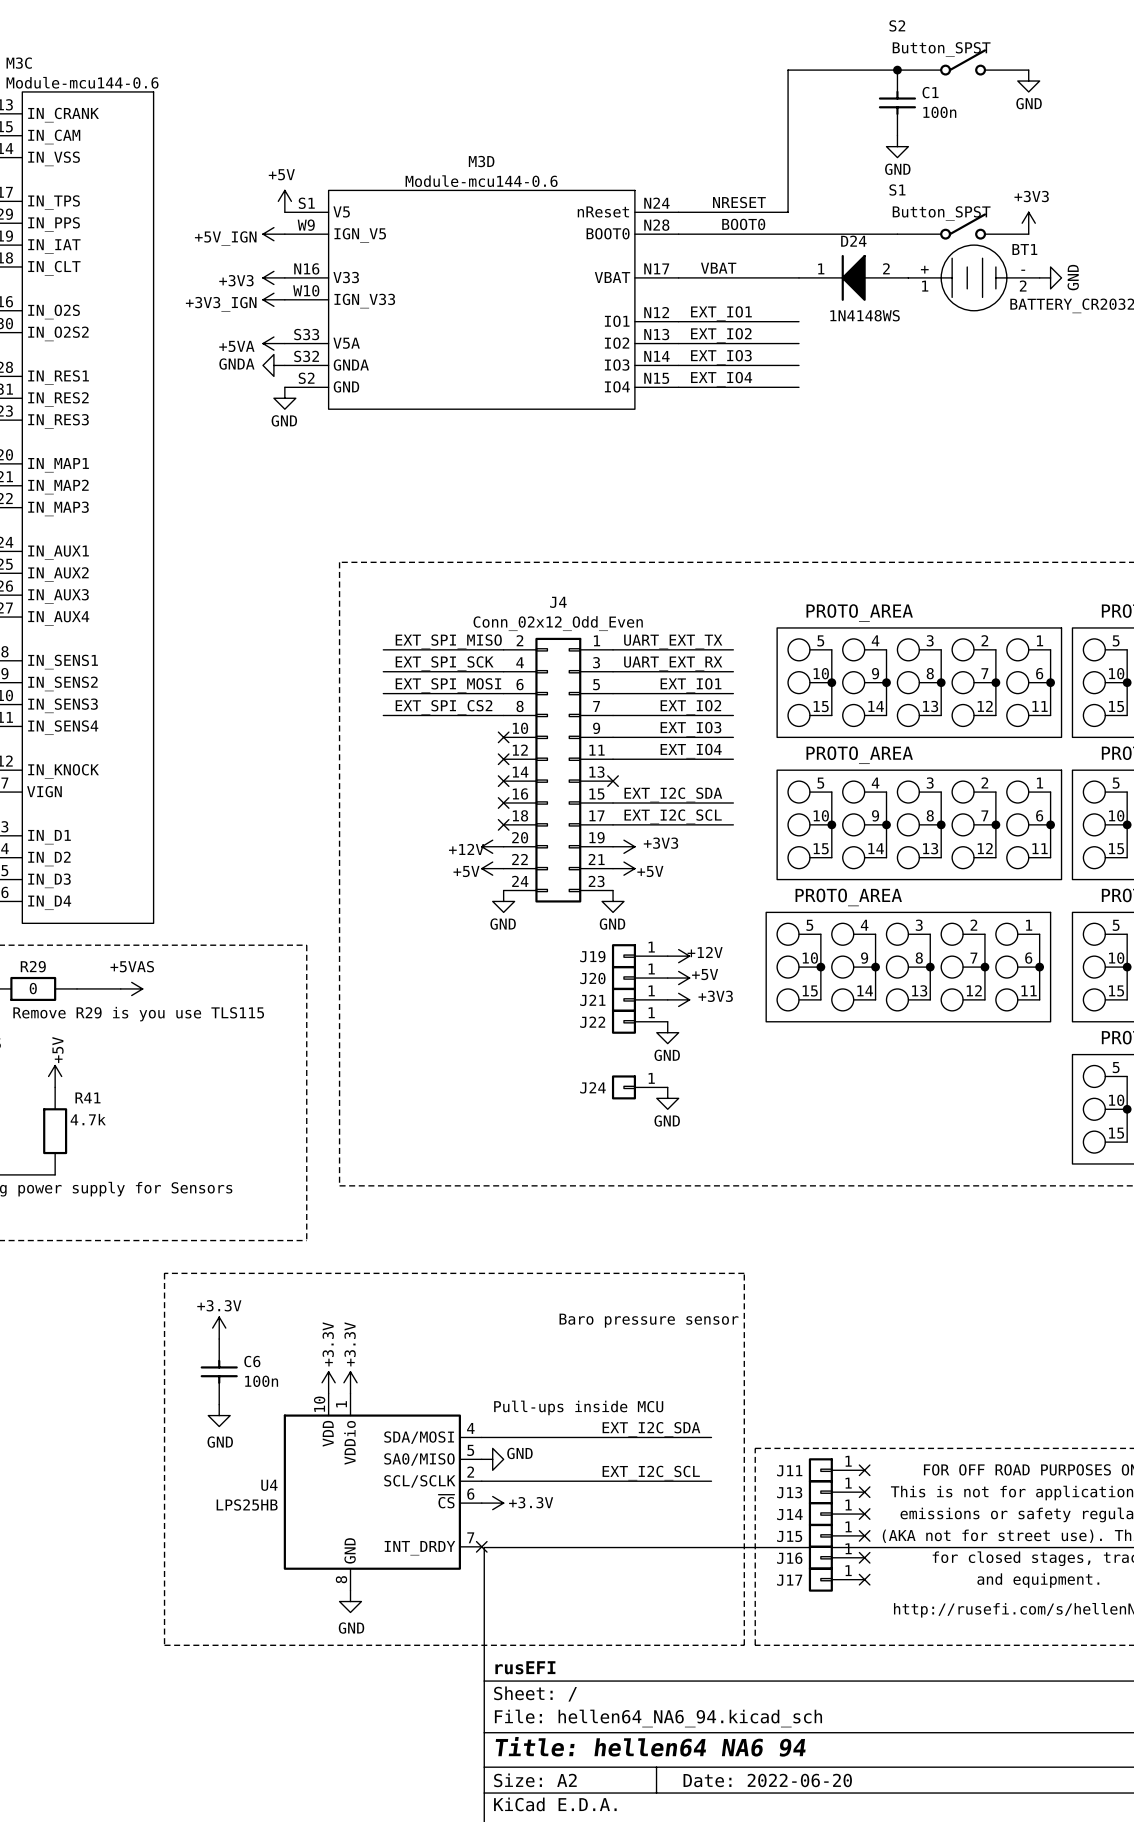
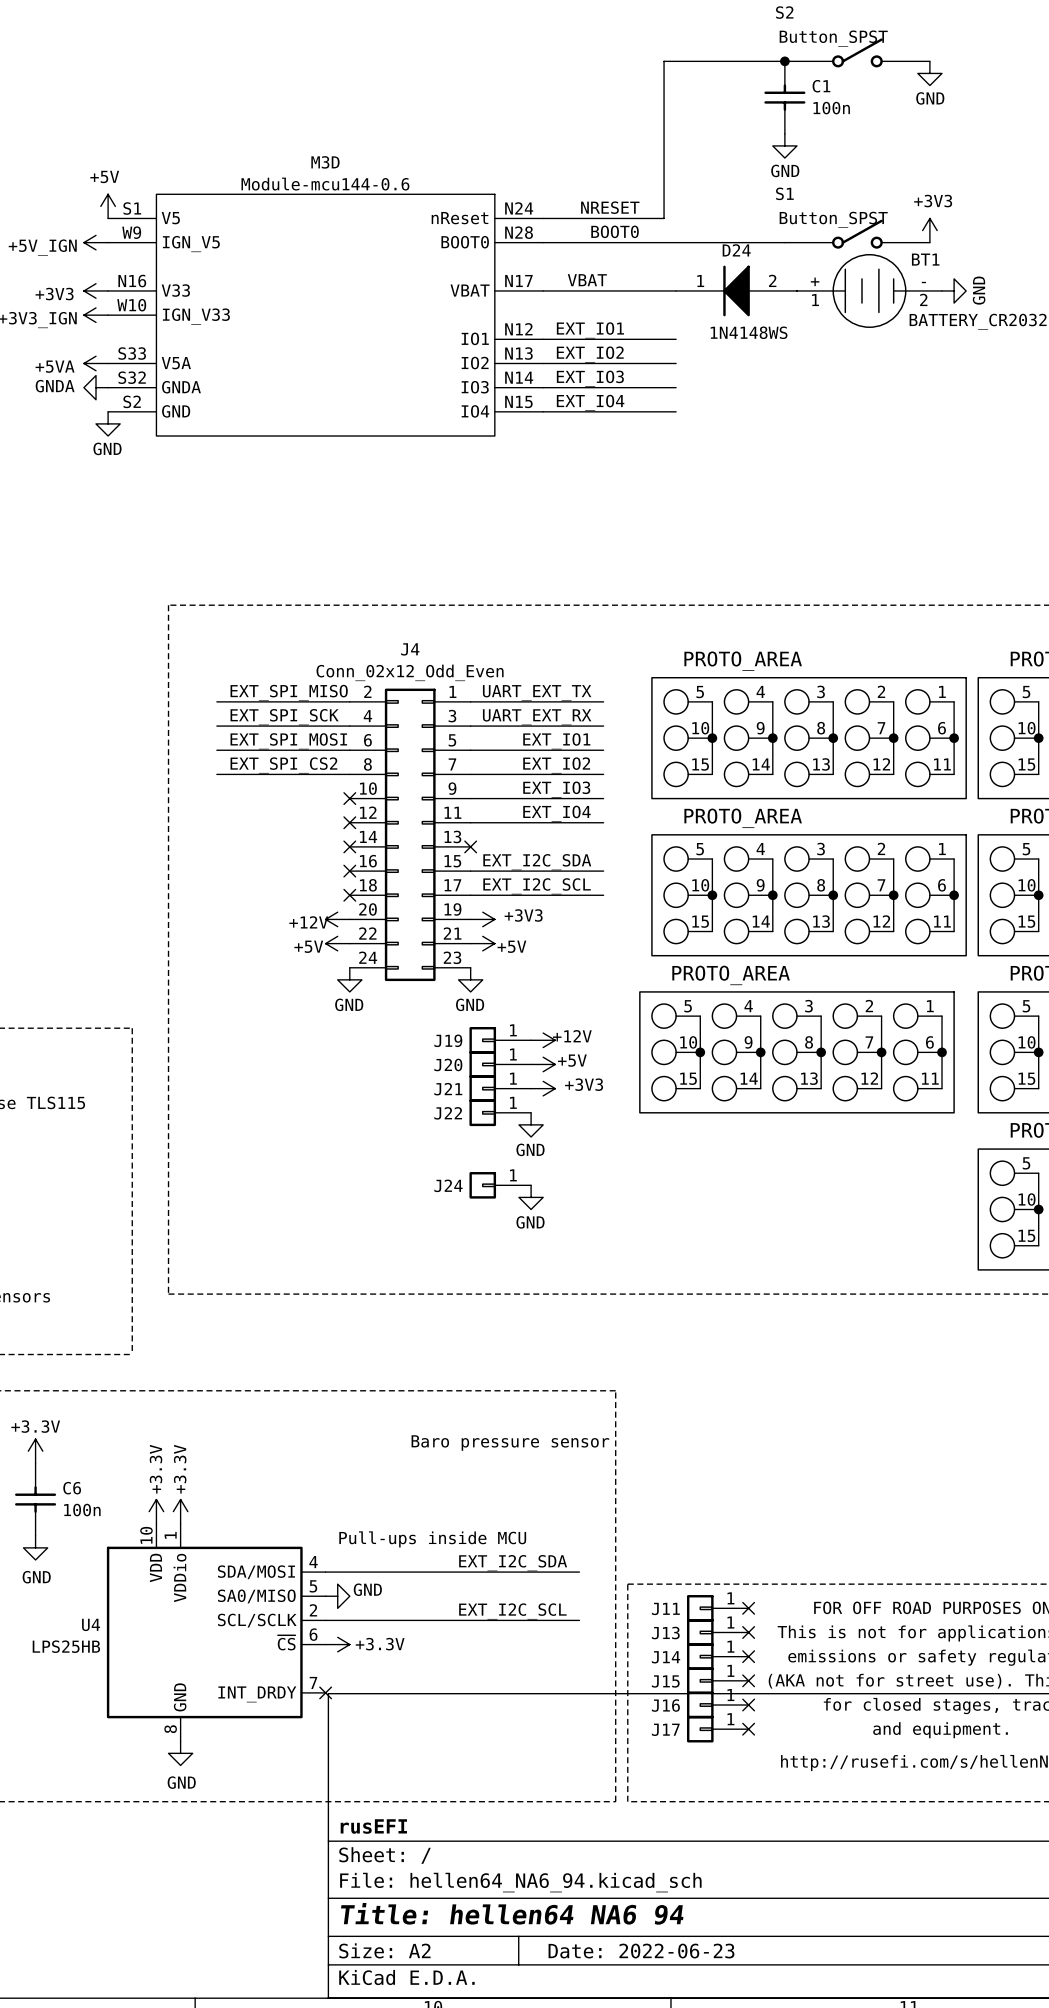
title block: Date: 2022-06-20 (767, 1780) -> Date: 2022-06-23 (641, 1951)

